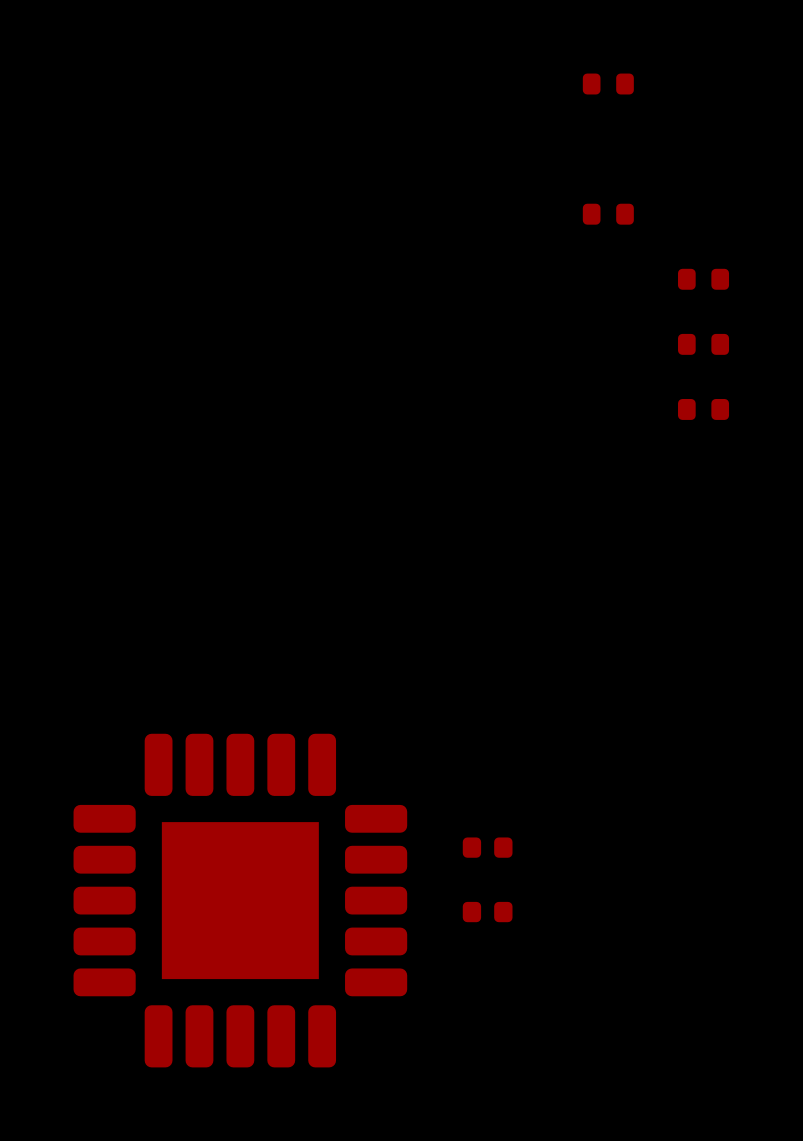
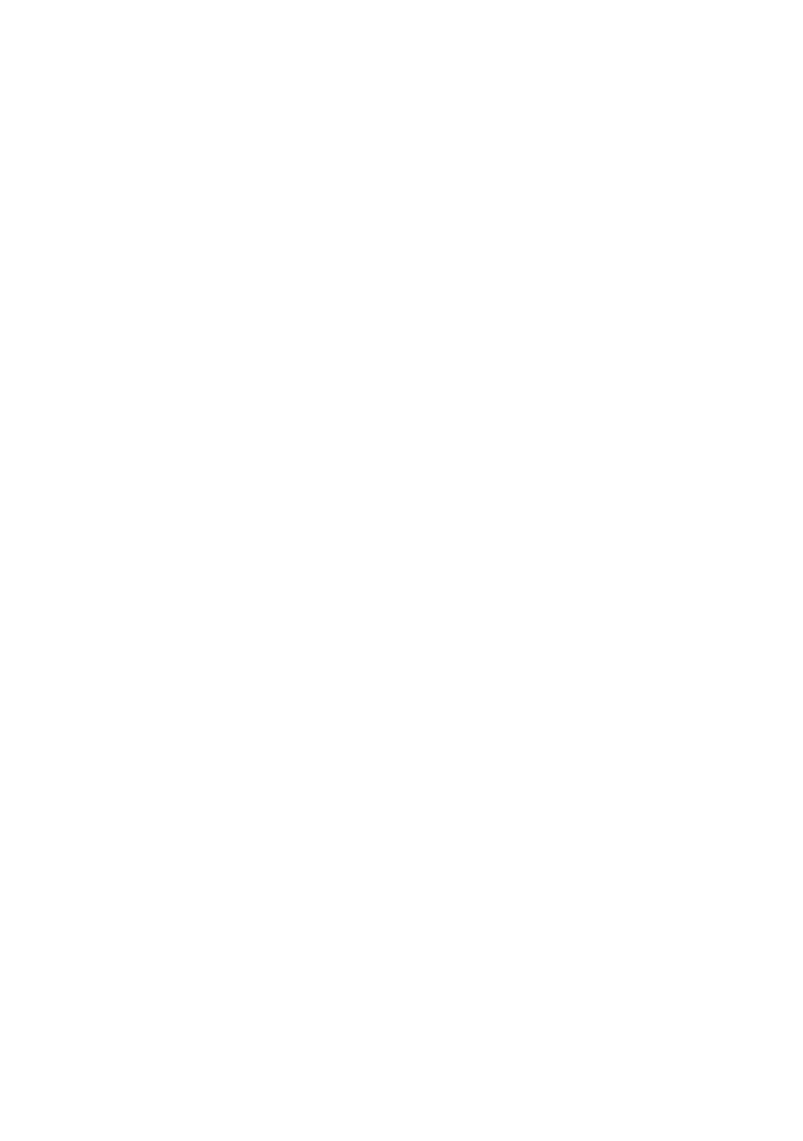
part: (608, 84) -> none
part: (608, 214) -> none
part: (703, 279) -> none
part: (703, 344) -> none
part: (703, 409) -> none
part: (487, 847) -> none
part: (240, 900) -> none
part: (487, 912) -> none

